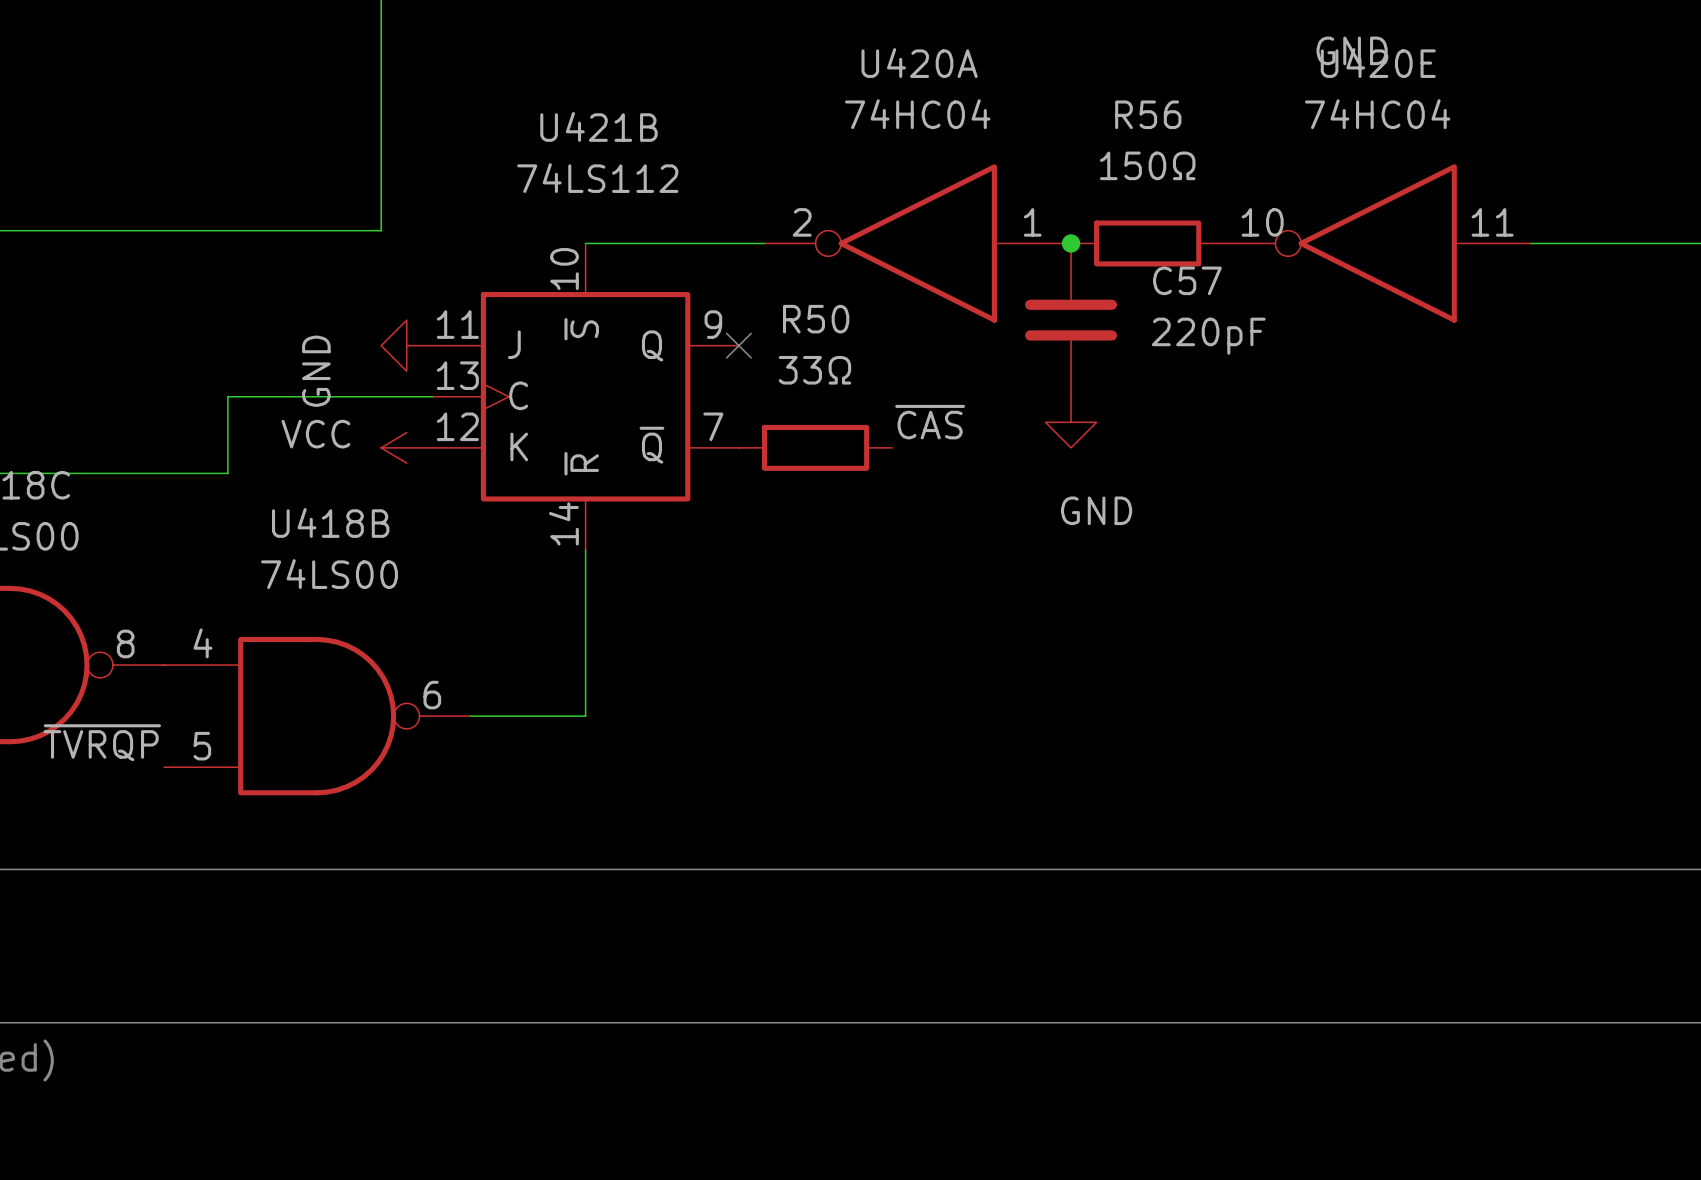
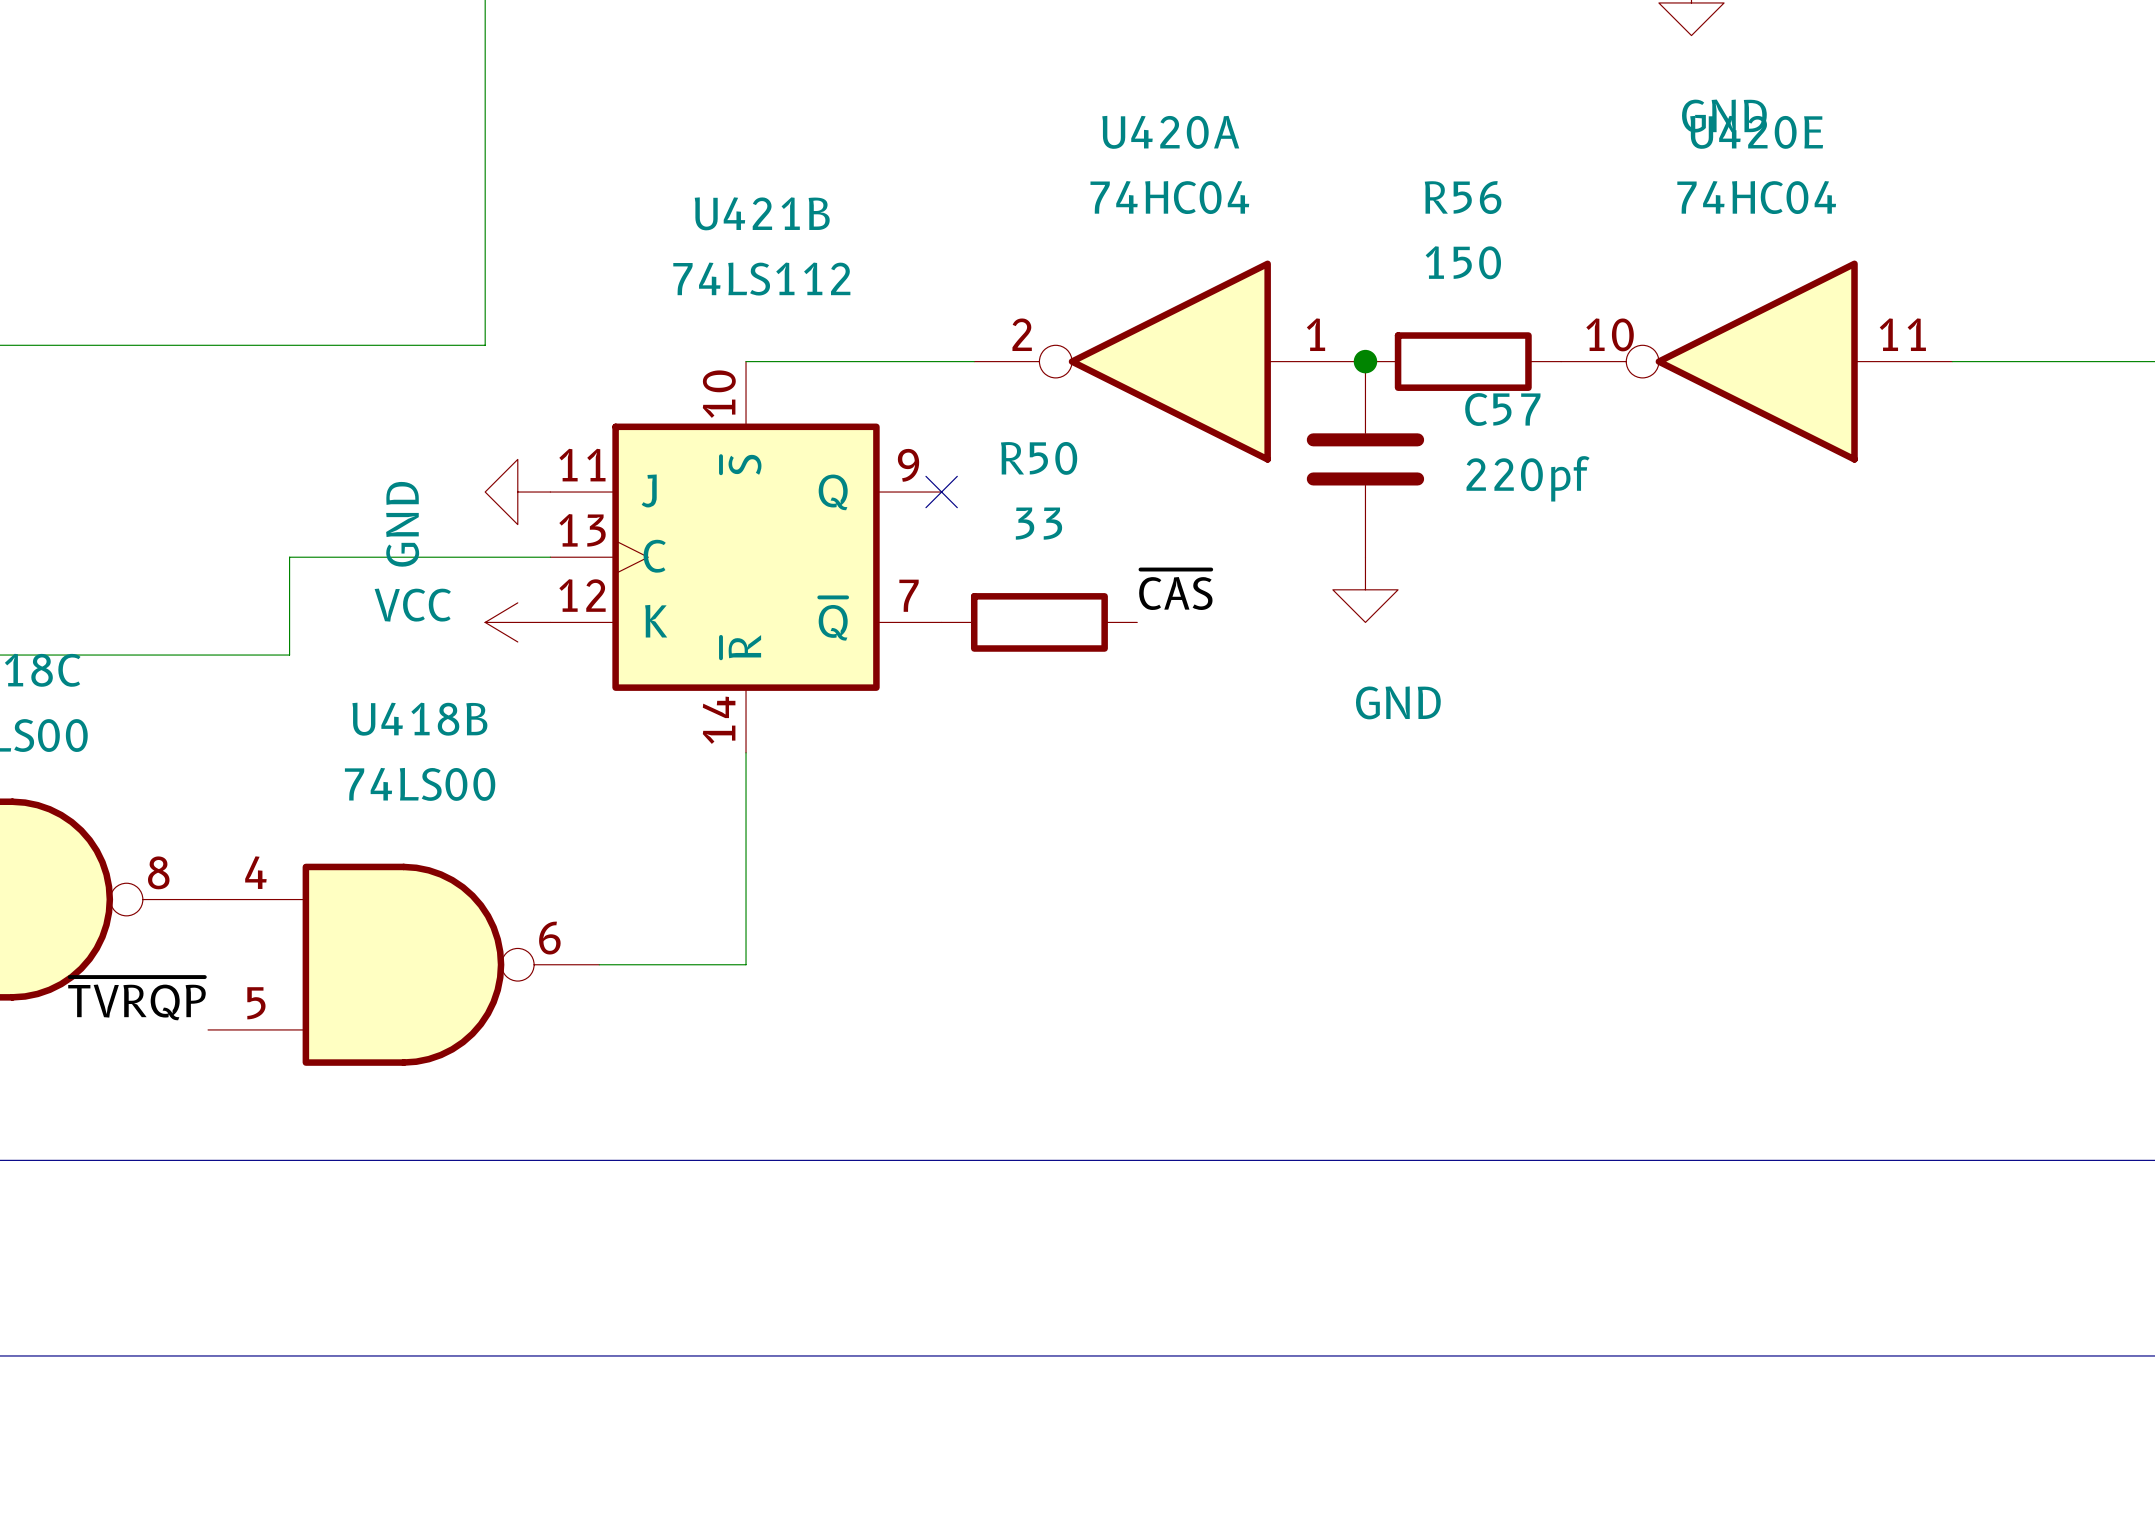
R56 value: 150Ω (1147, 165) -> 150 (1463, 262)
C57 value: 220pF (1208, 336) -> 220pf (1528, 478)
R50 value: 33Ω (814, 370) -> 33 (1038, 523)

